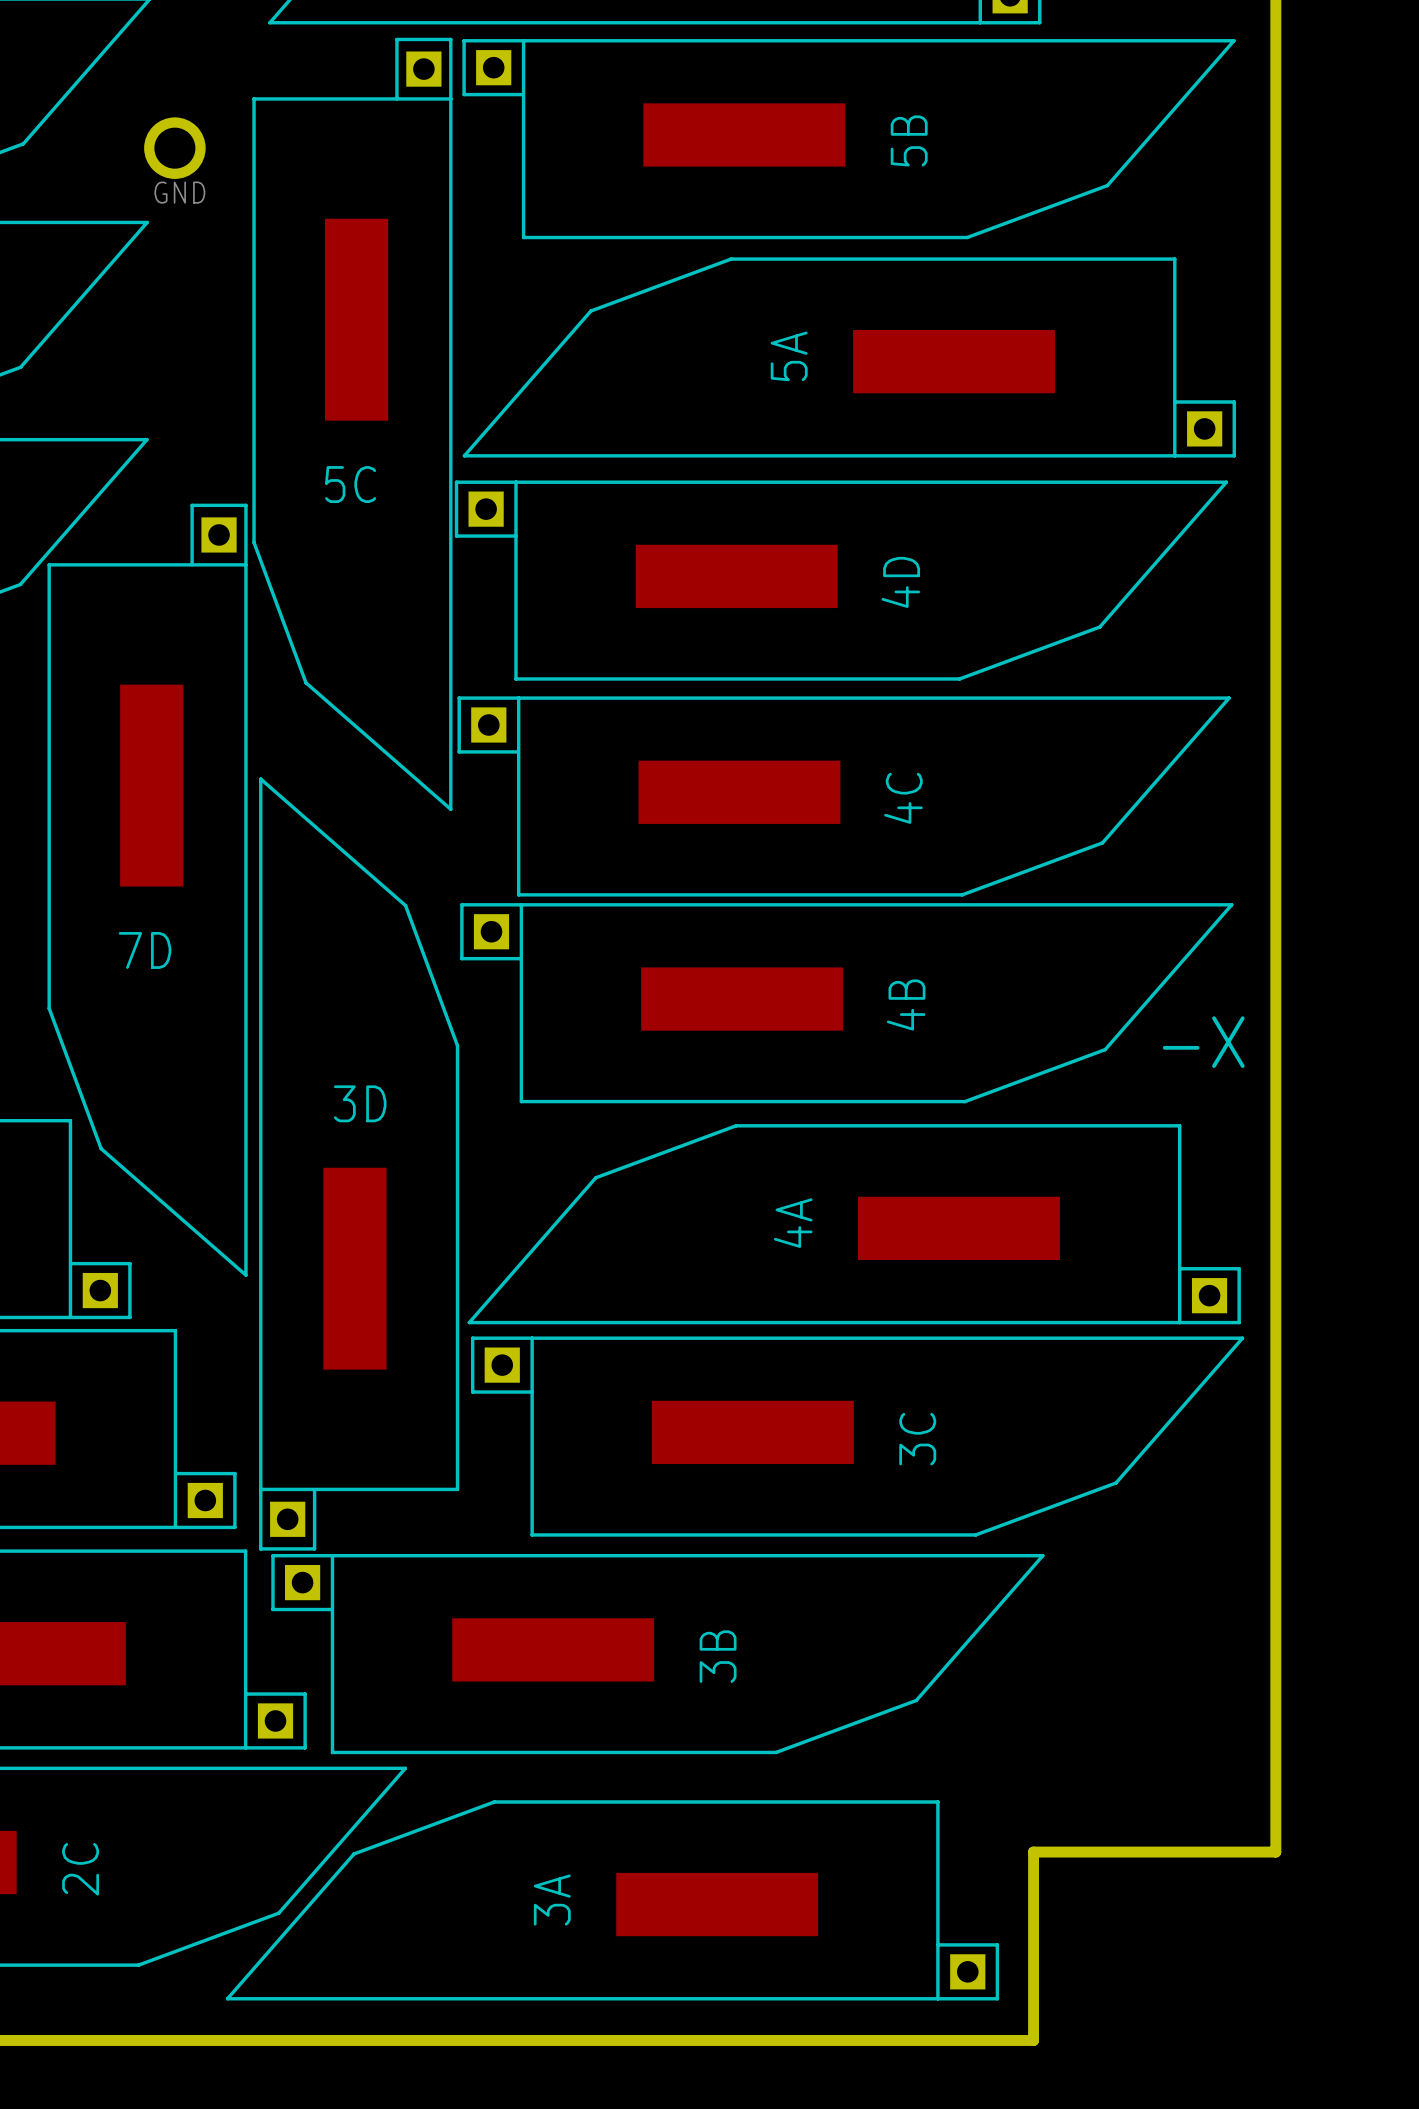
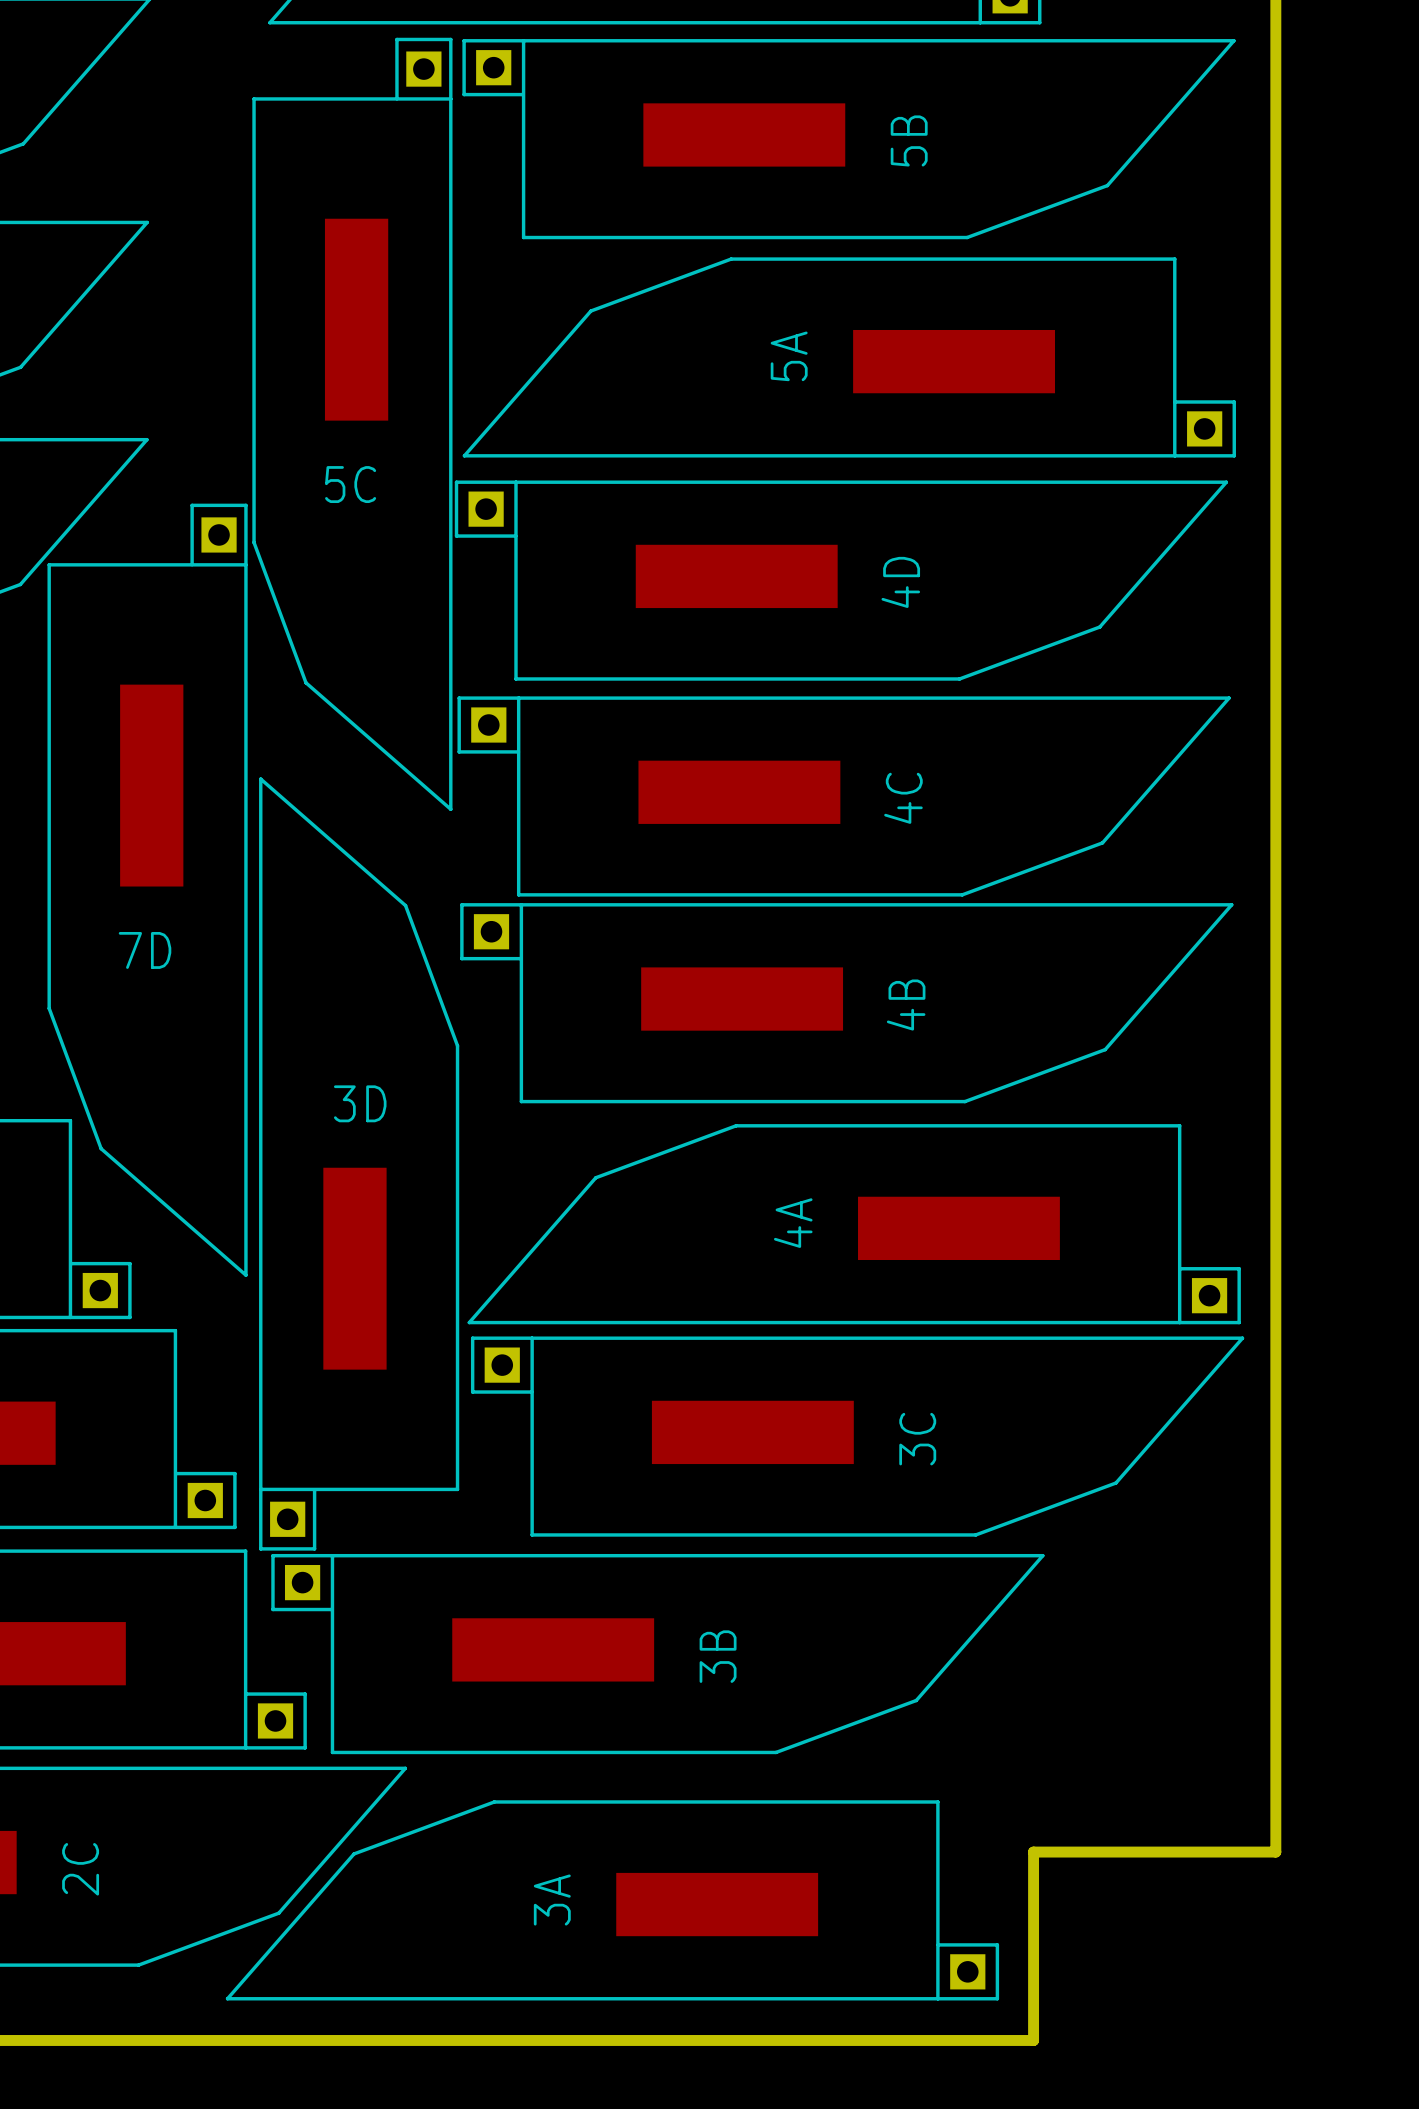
part: GND (174, 148) -> none
text: -X (1203, 1042) -> none

